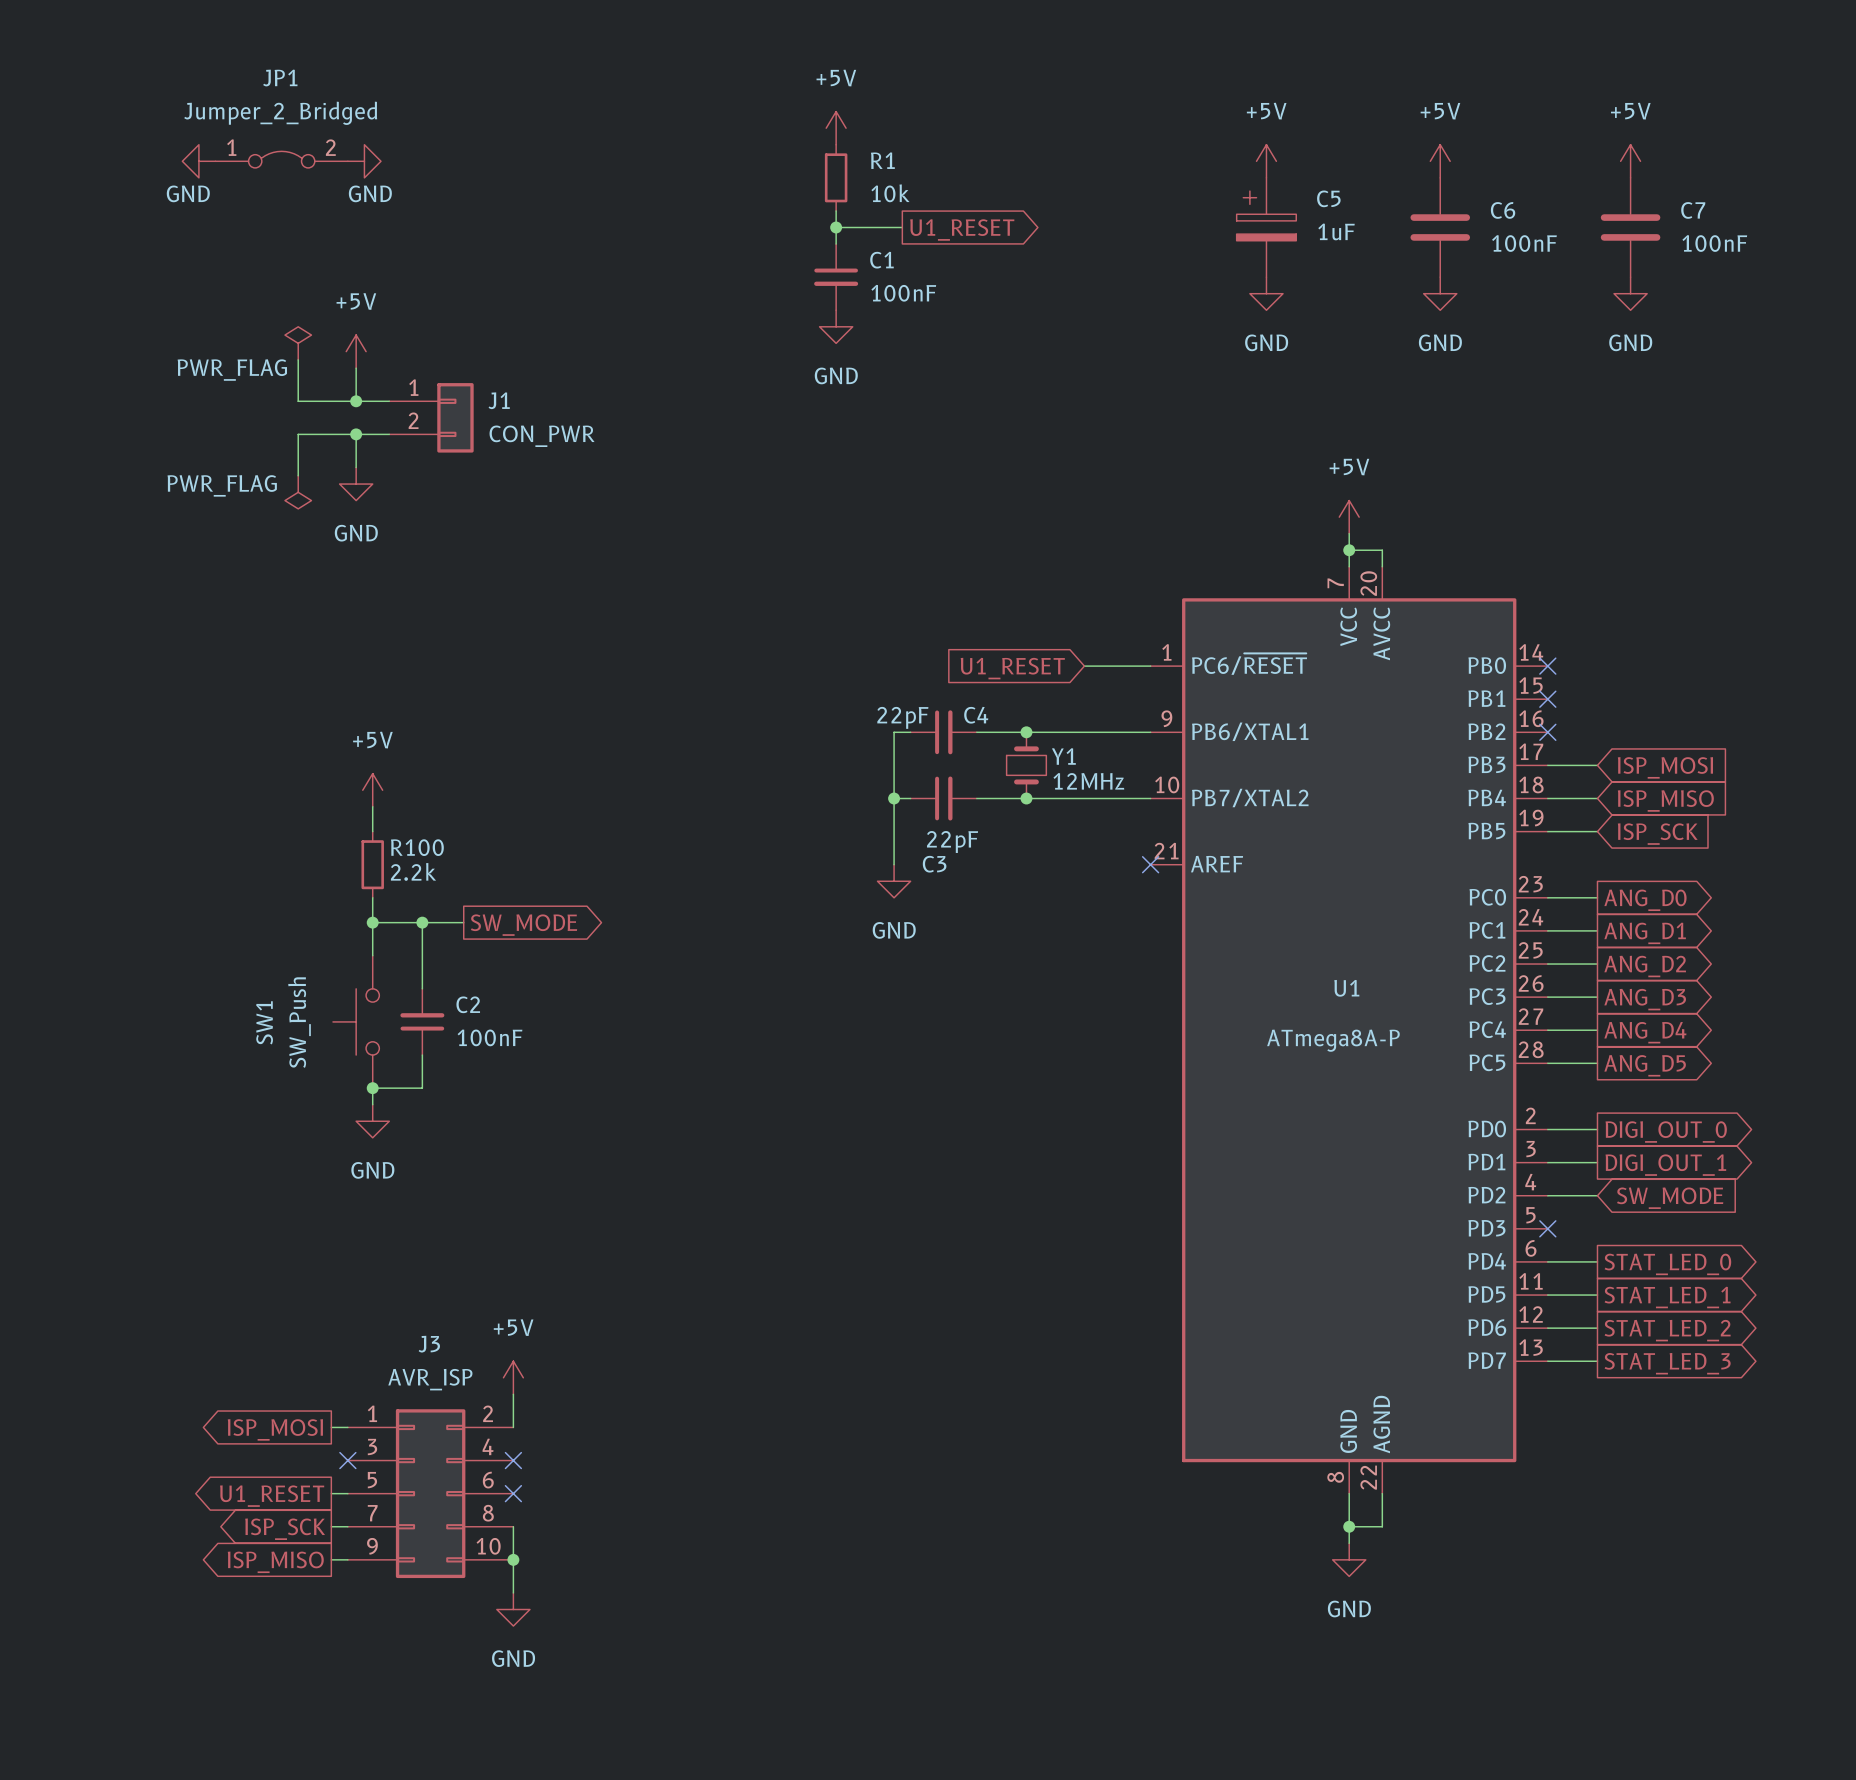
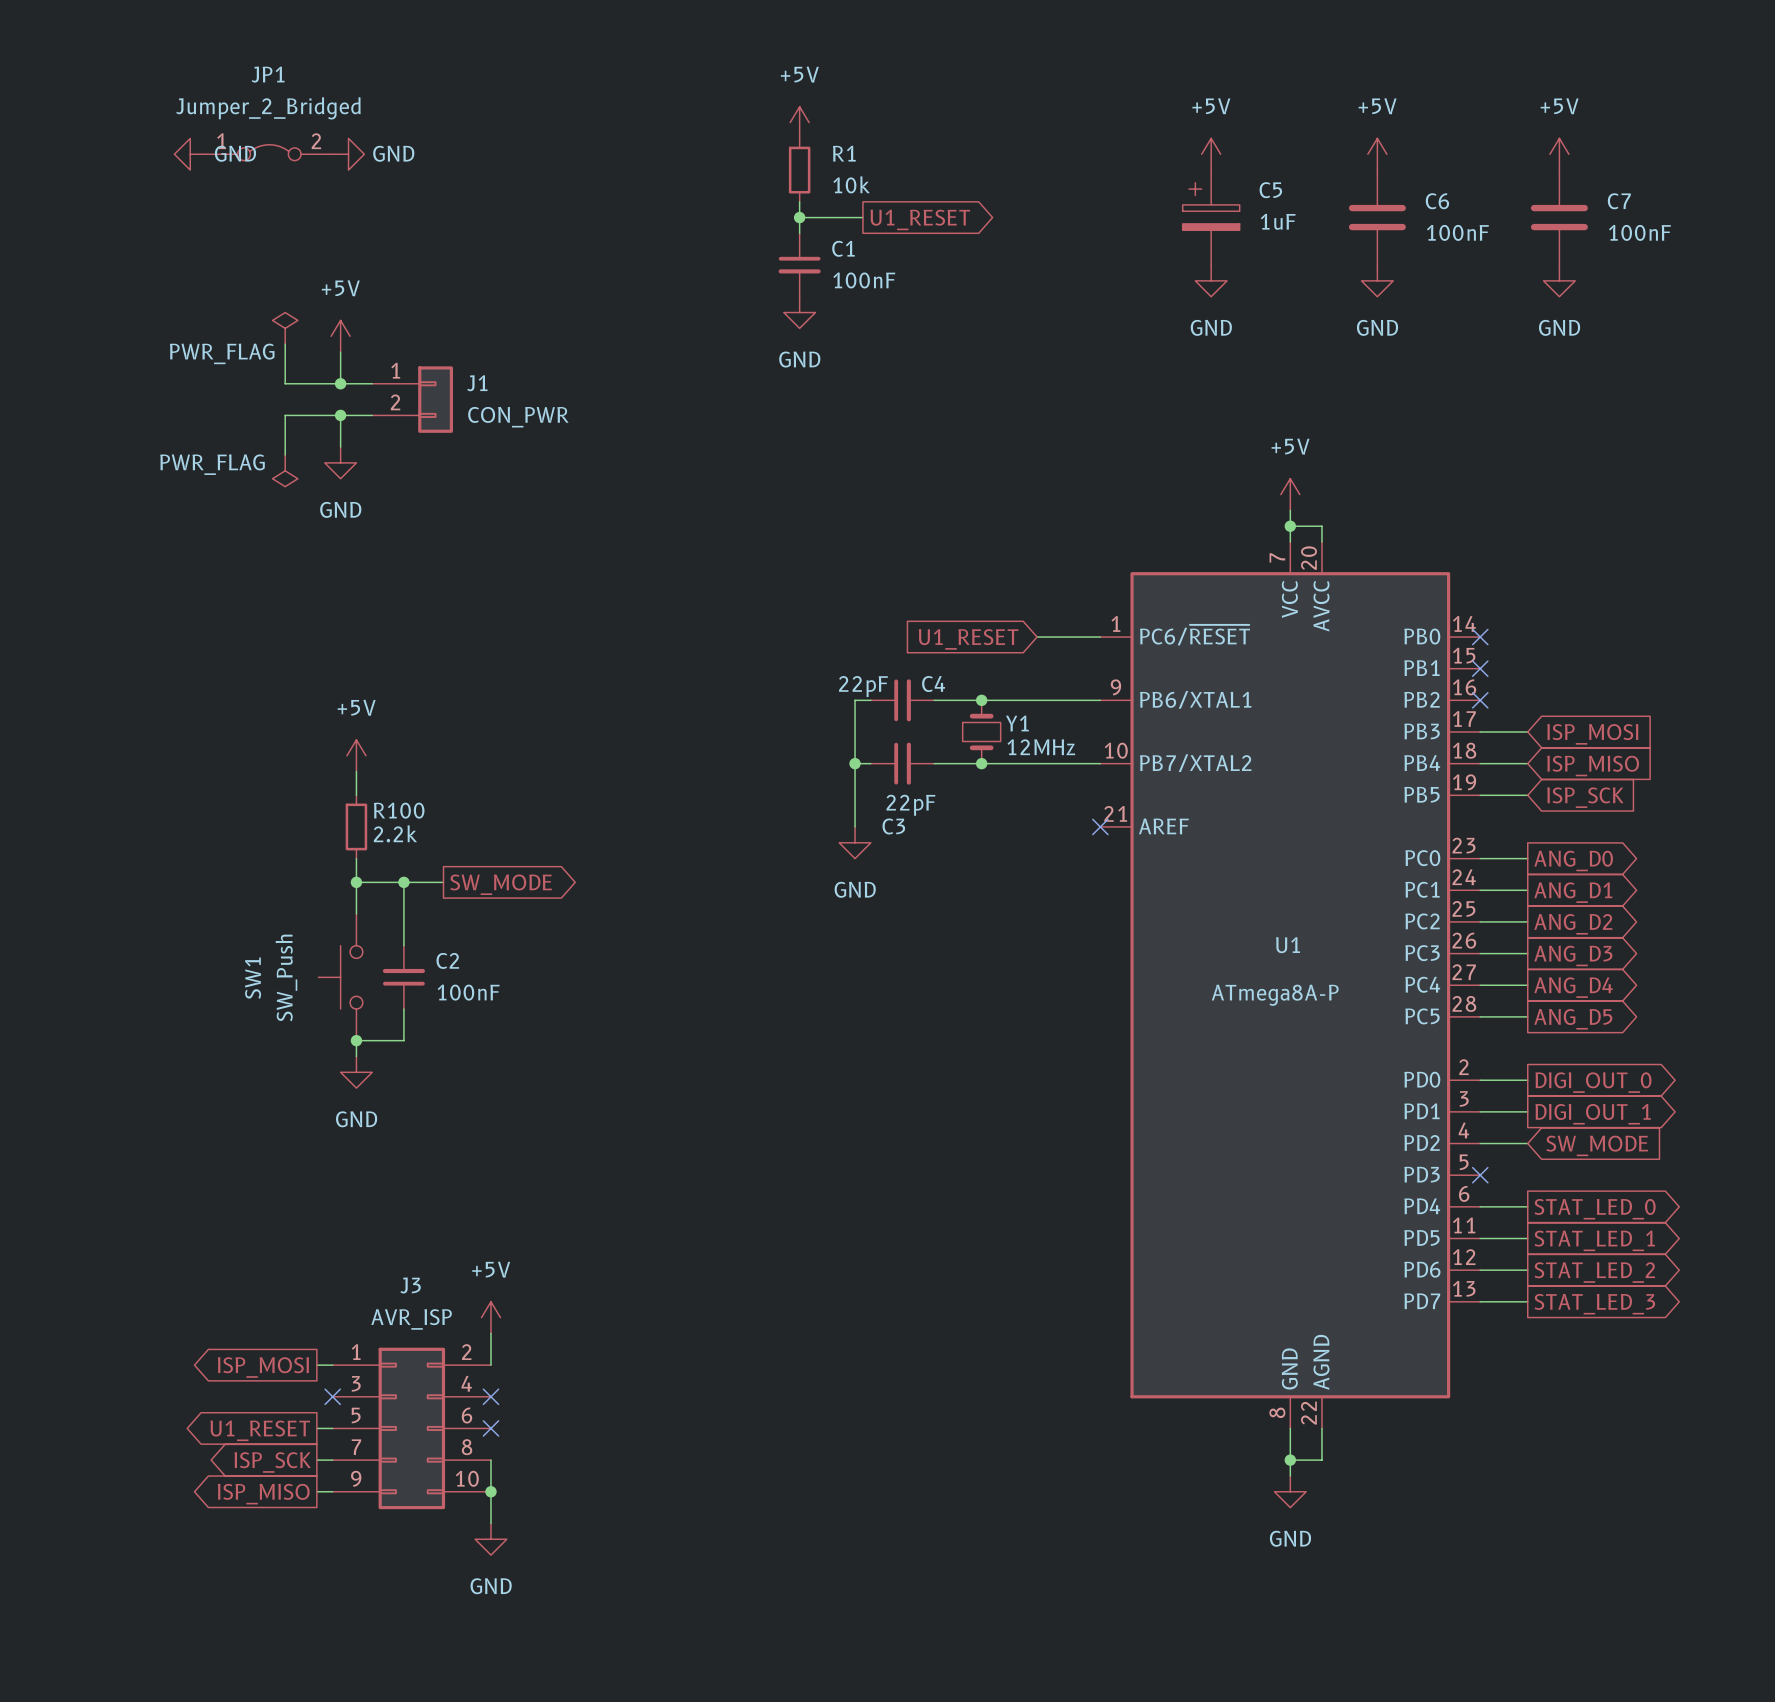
power symbol text position: GND (188, 193) -> GND (235, 153)
power symbol text position: GND (370, 193) -> GND (393, 153)

